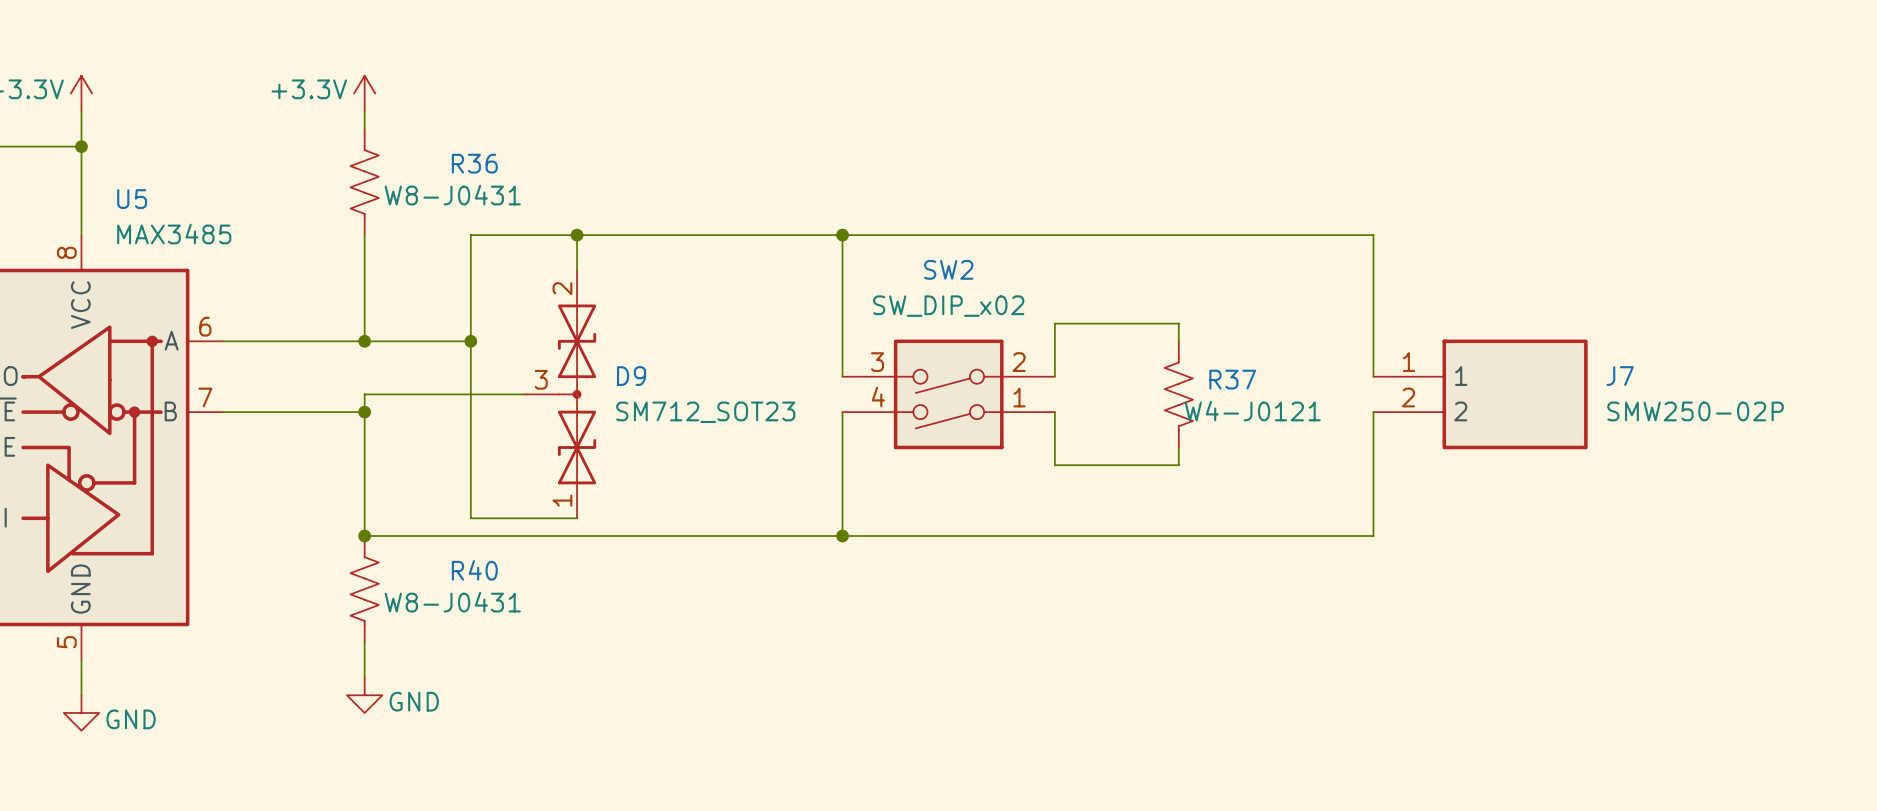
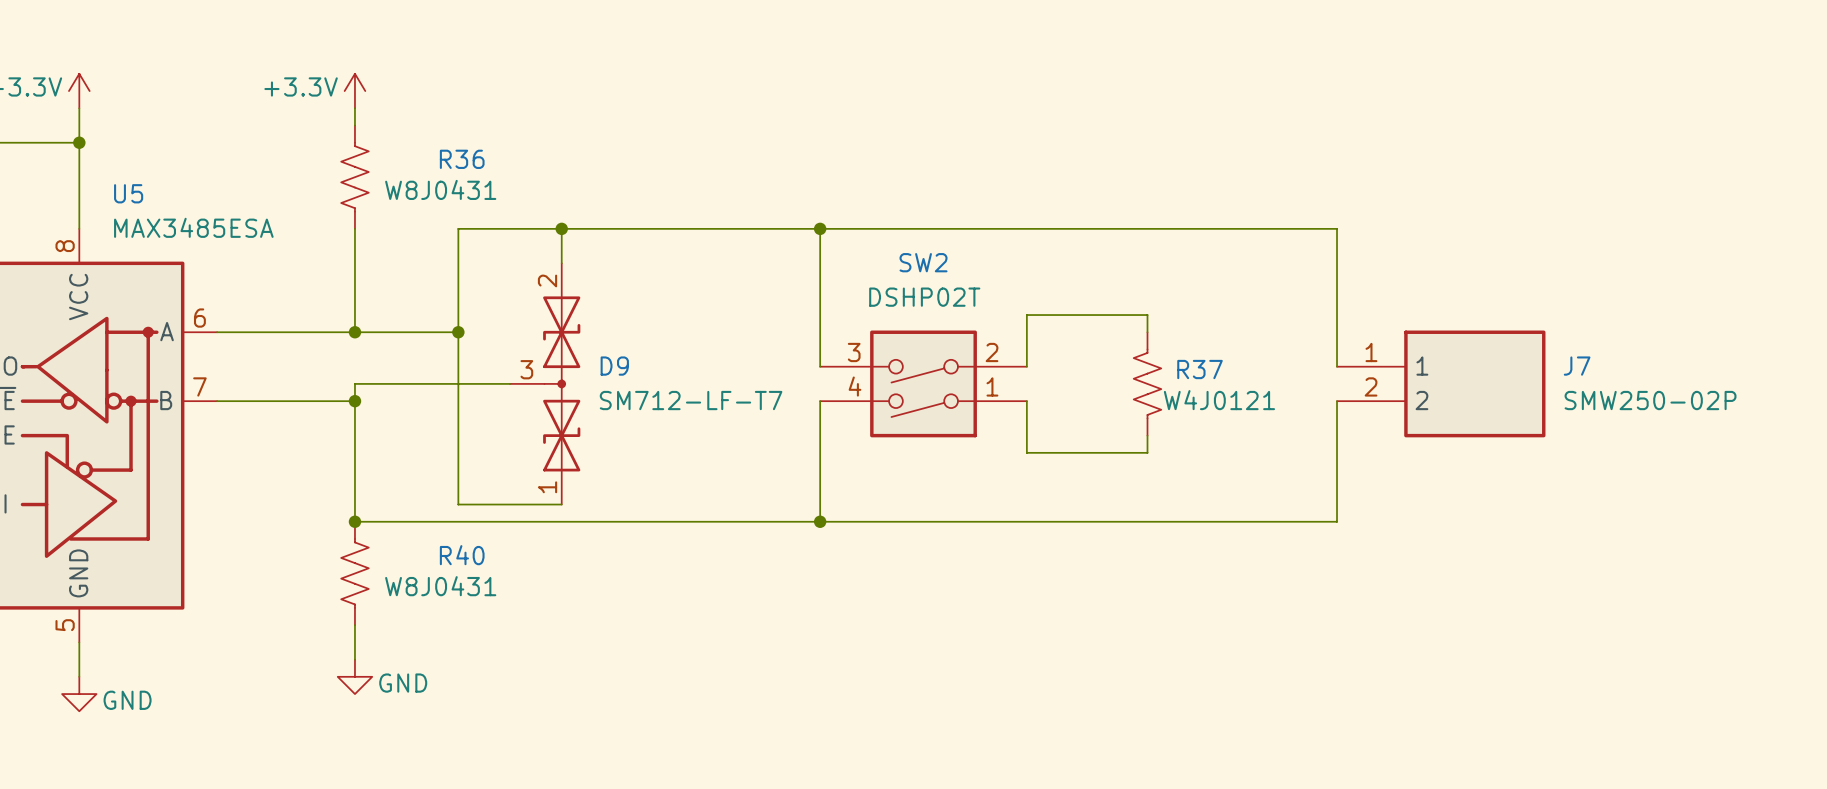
R36 value: W8-J0431 (452, 195) -> W8J0431 (440, 189)
U5 value: MAX3485 (174, 234) -> MAX3485ESA (193, 227)
SW2 value: SW_DIP_x02 (948, 306) -> DSHP02T (924, 297)
R37 value: W4-J0121 (1252, 411) -> W4J0121 (1219, 400)
D9 value: SM712_SOT23 (705, 412) -> SM712-LF-T7 (691, 400)
R40 value: W8-J0431 (452, 602) -> W8J0431 (440, 586)

